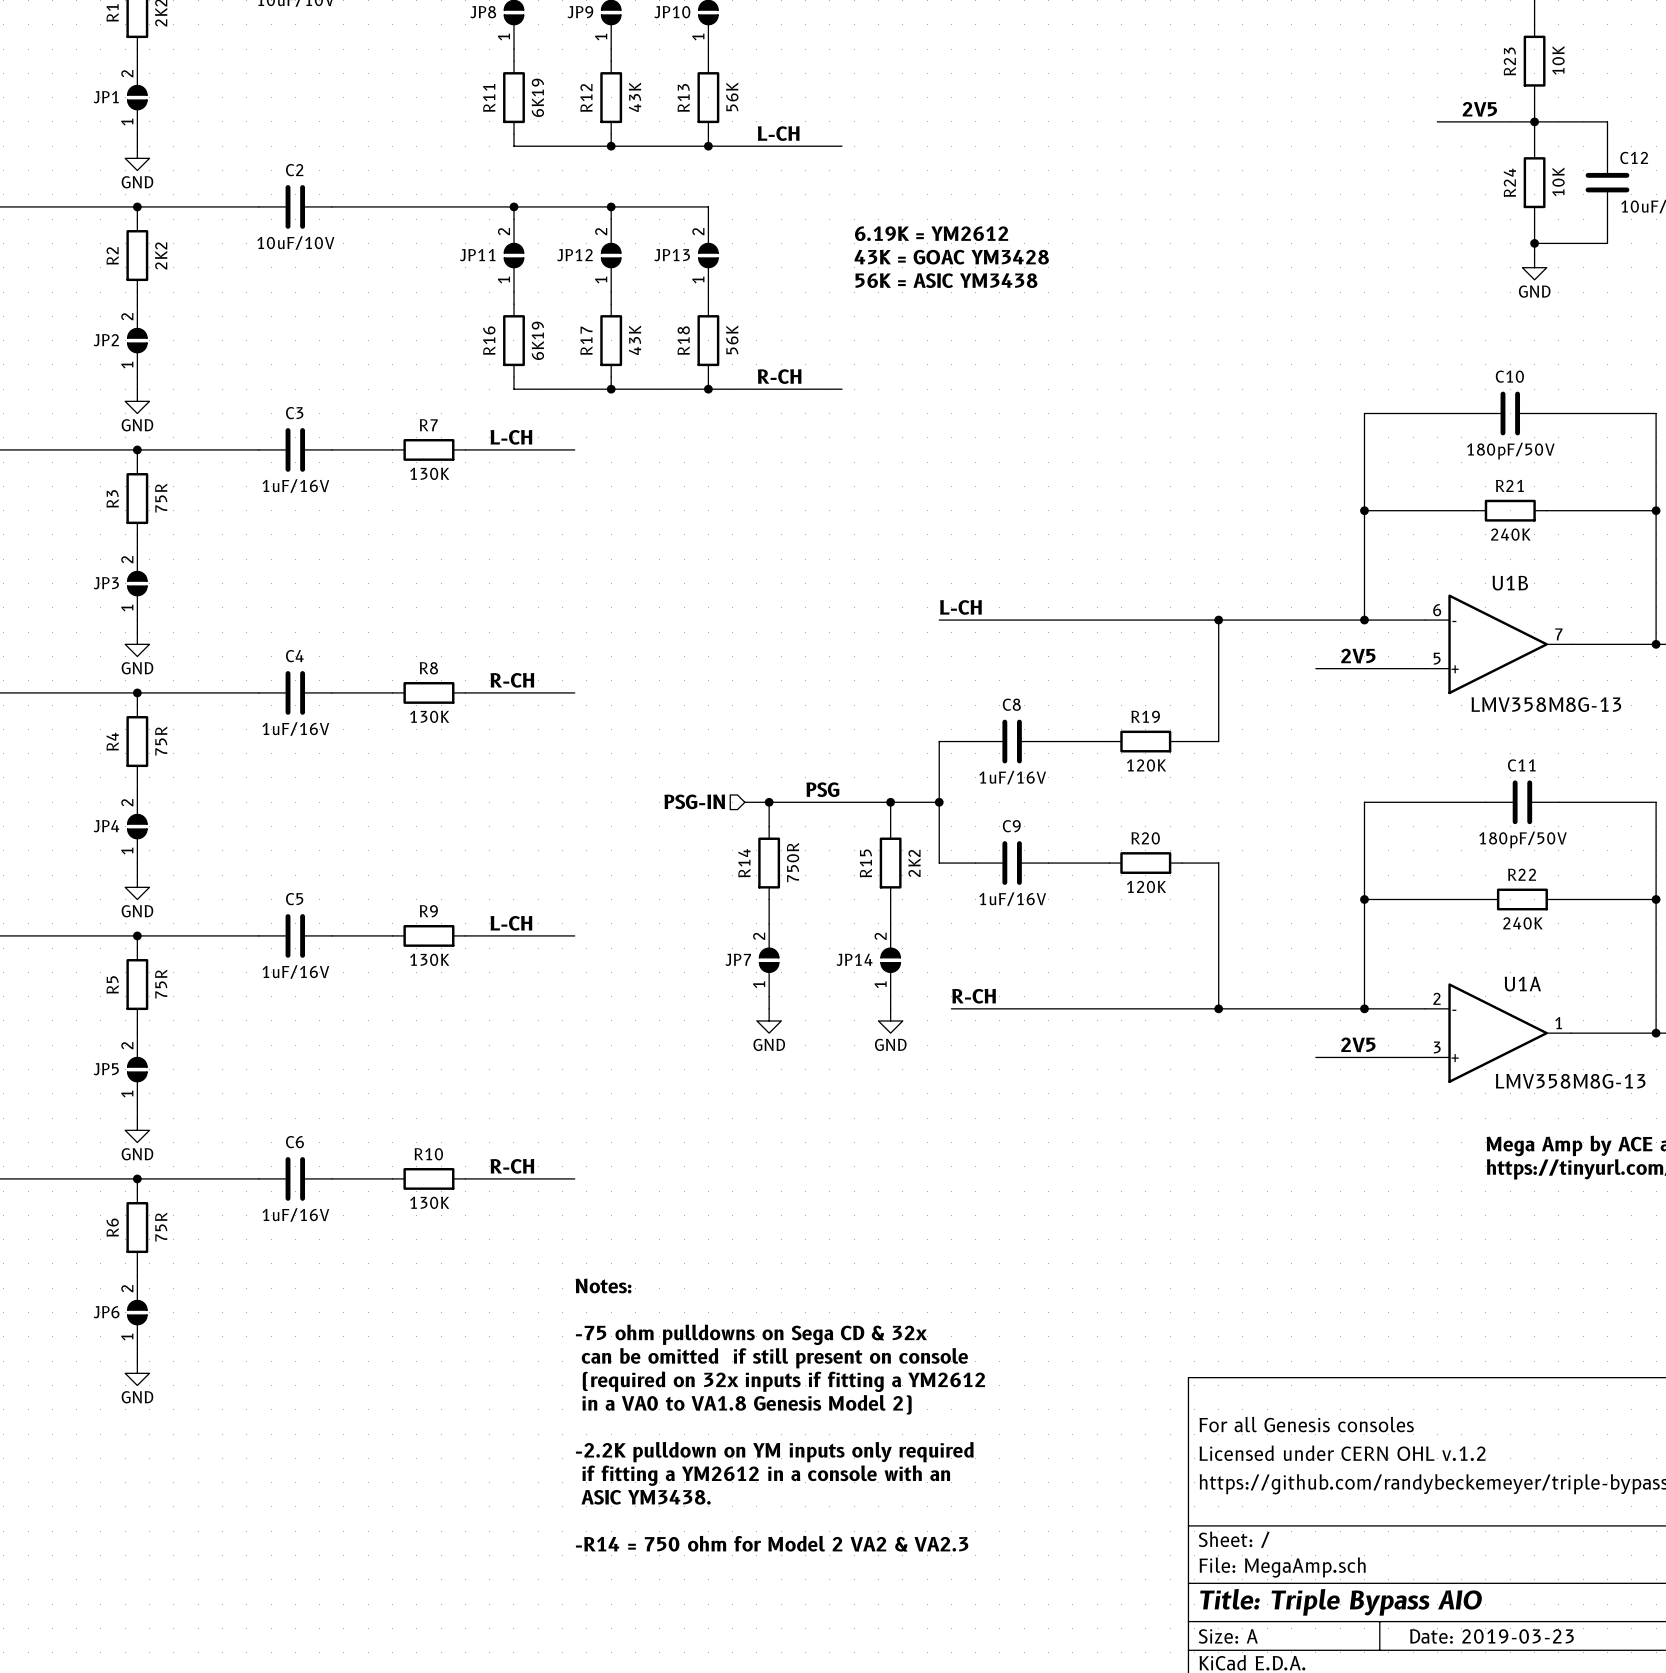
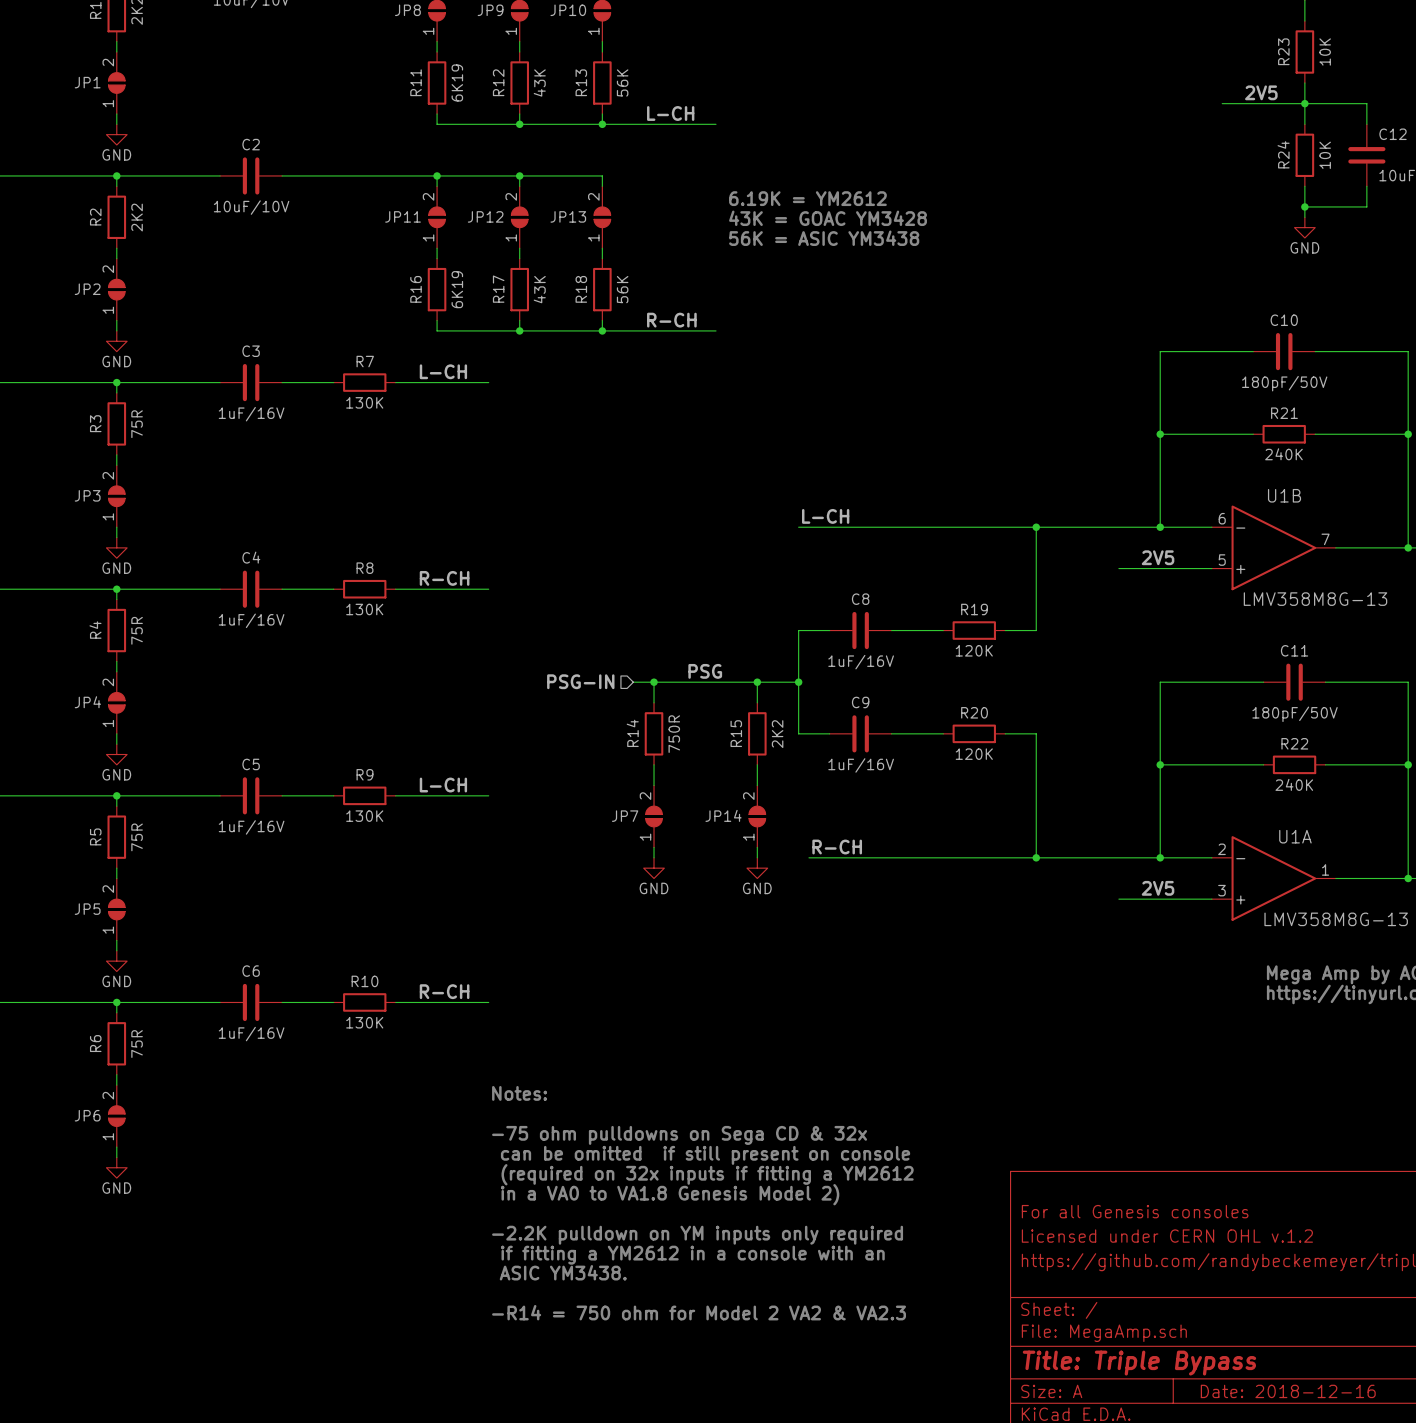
title block: Title: Triple Bypass AIO (1341, 1602) -> Title: Triple Bypass (1139, 1363)
title block: Date: 2019-03-23 (1491, 1636) -> Date: 2018-12-16 (1288, 1391)

